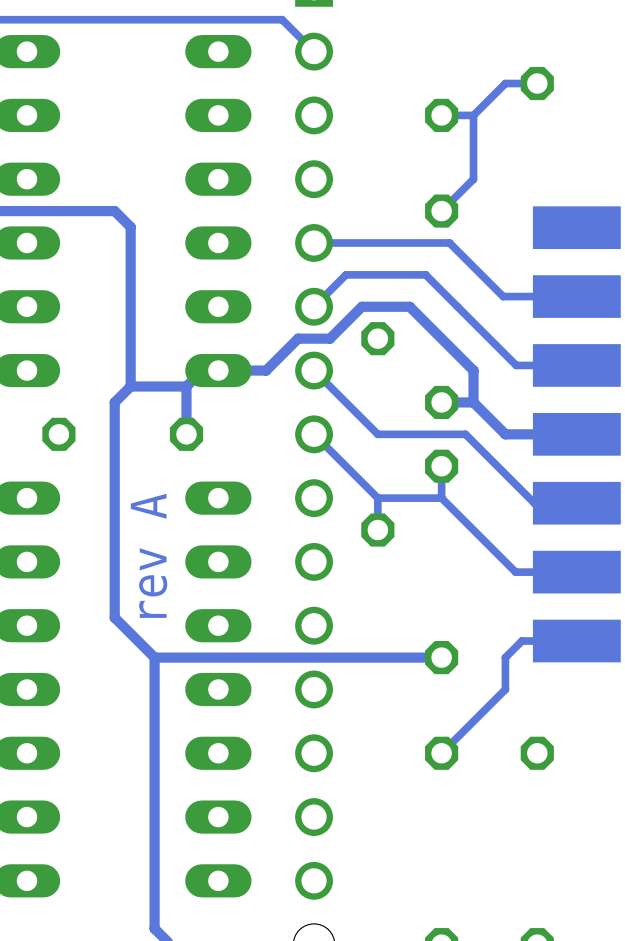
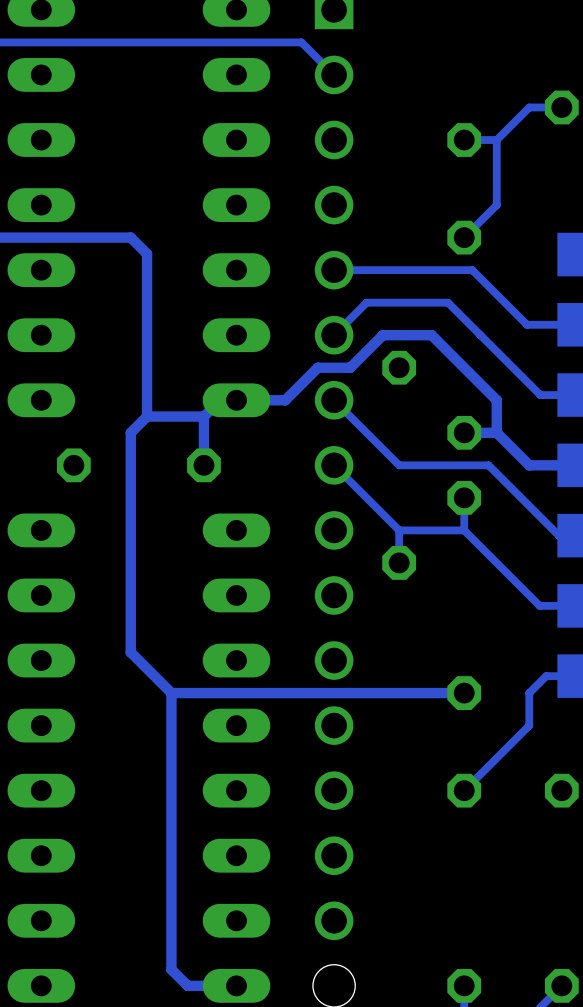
text: rev A (149, 555) -> none

